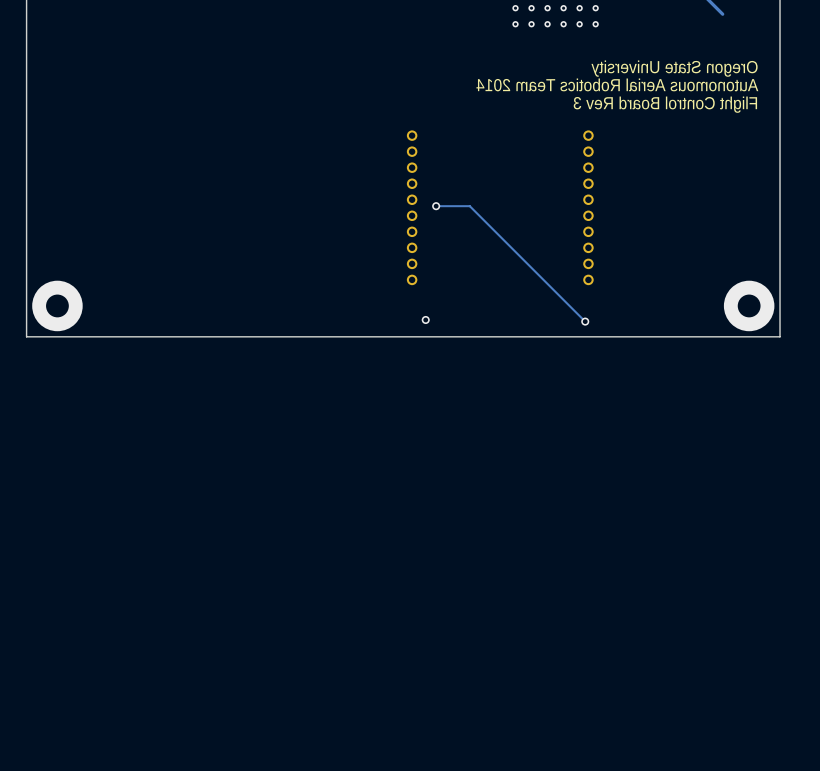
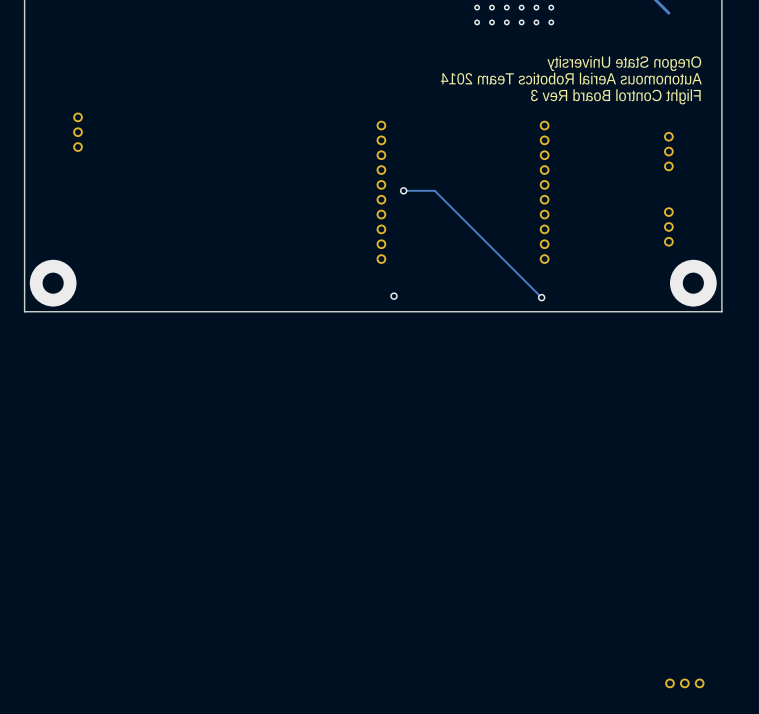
part: none -> (78, 132)
part: none -> (668, 151)
part: none -> (668, 226)
part: none -> (684, 683)

